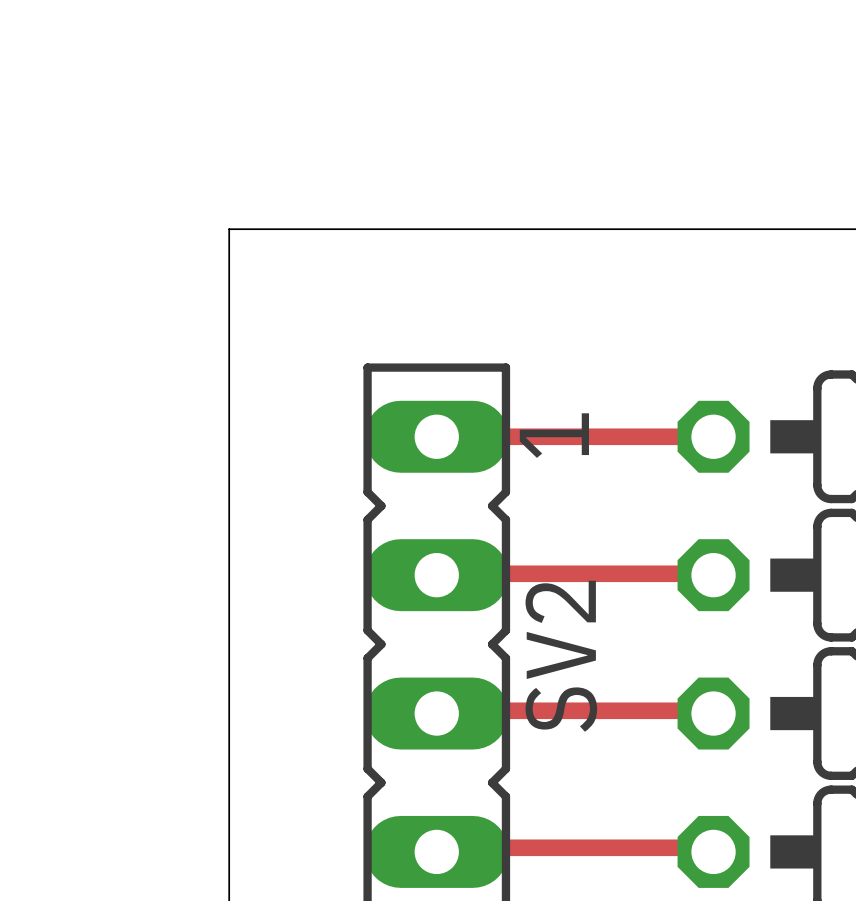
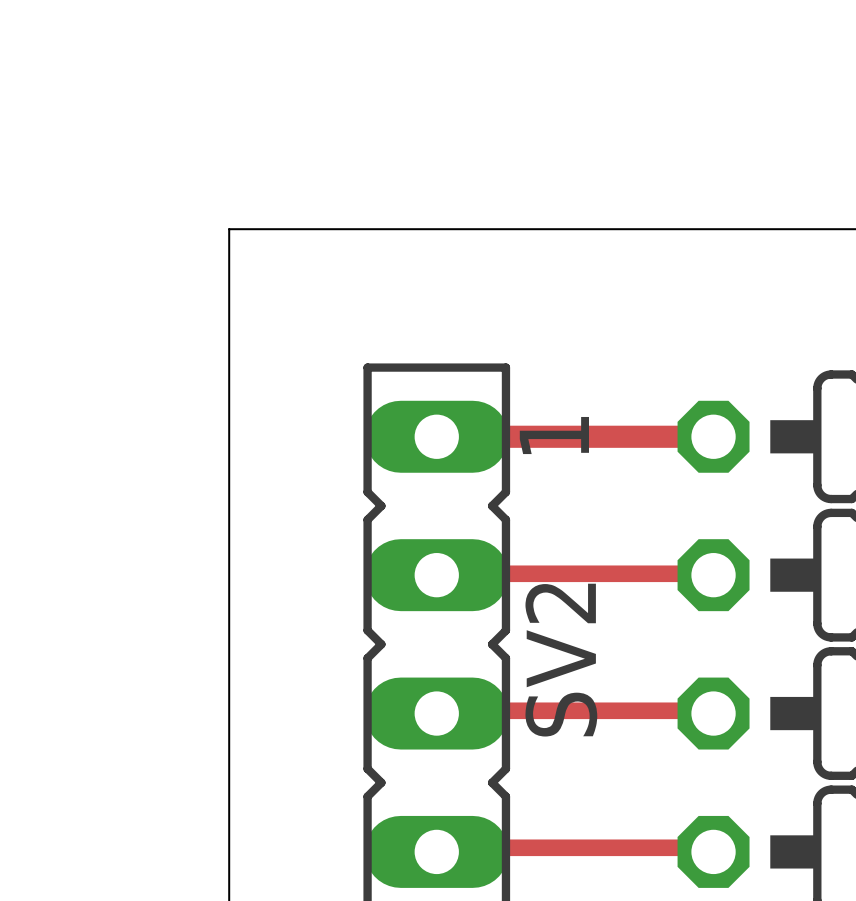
top track width: thin (436, 436) (713, 436) -> thick (436, 436) (713, 436)

